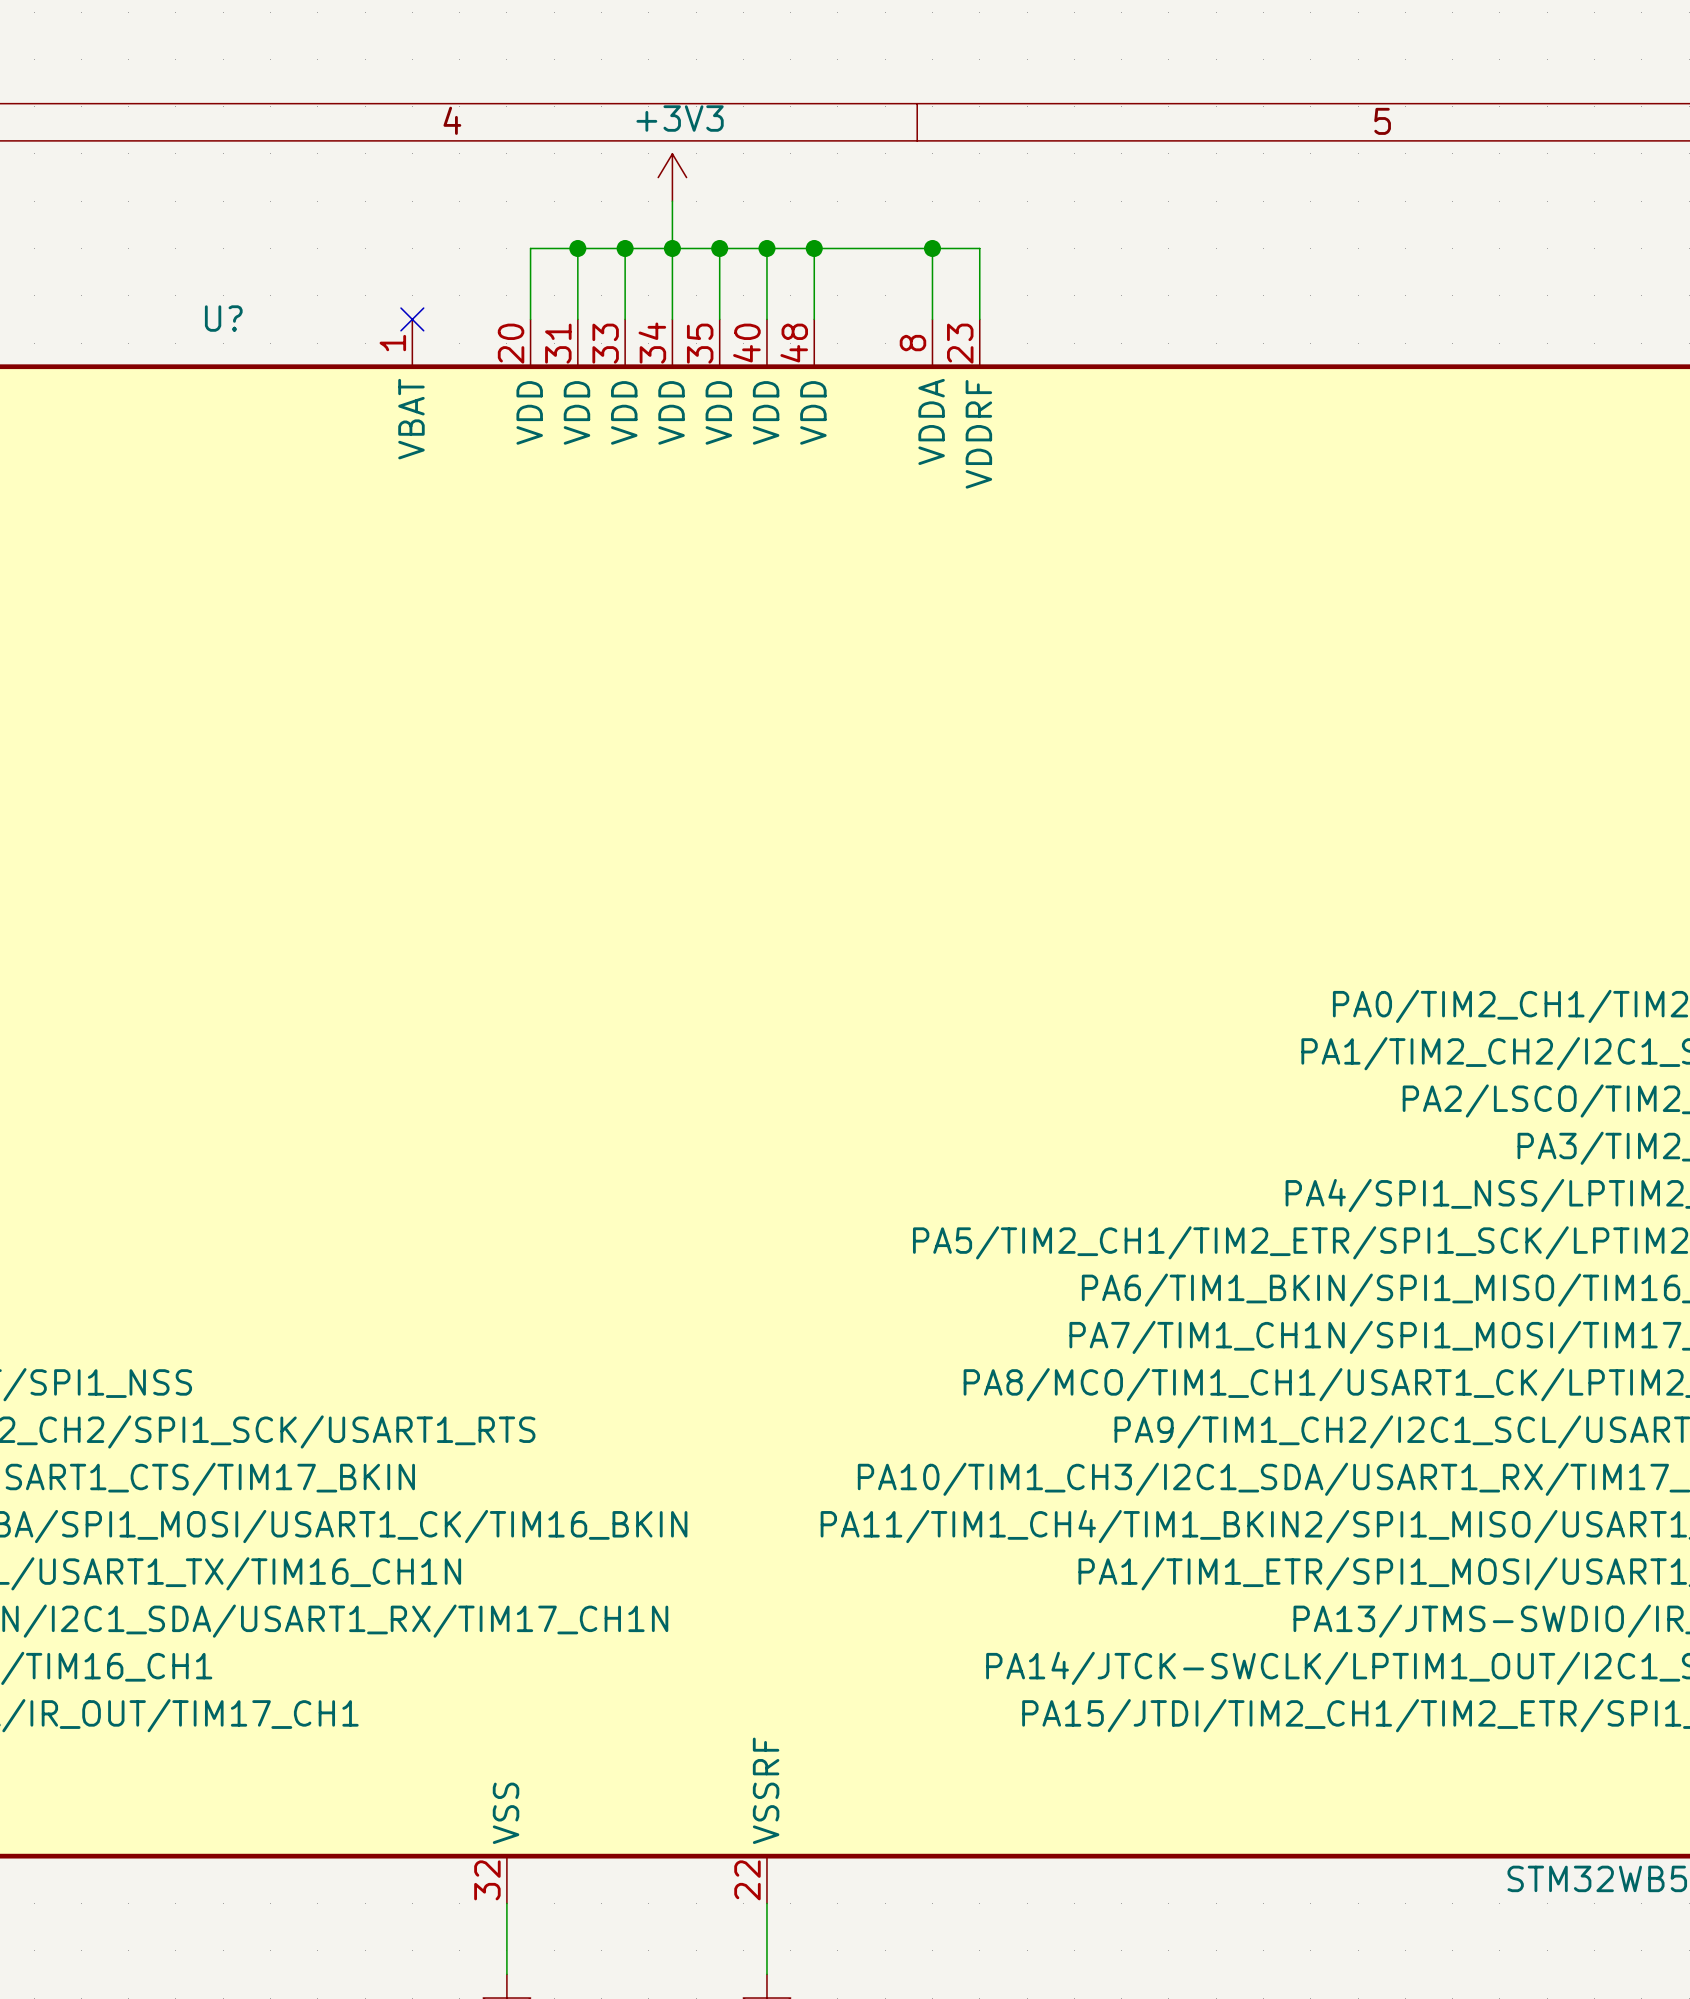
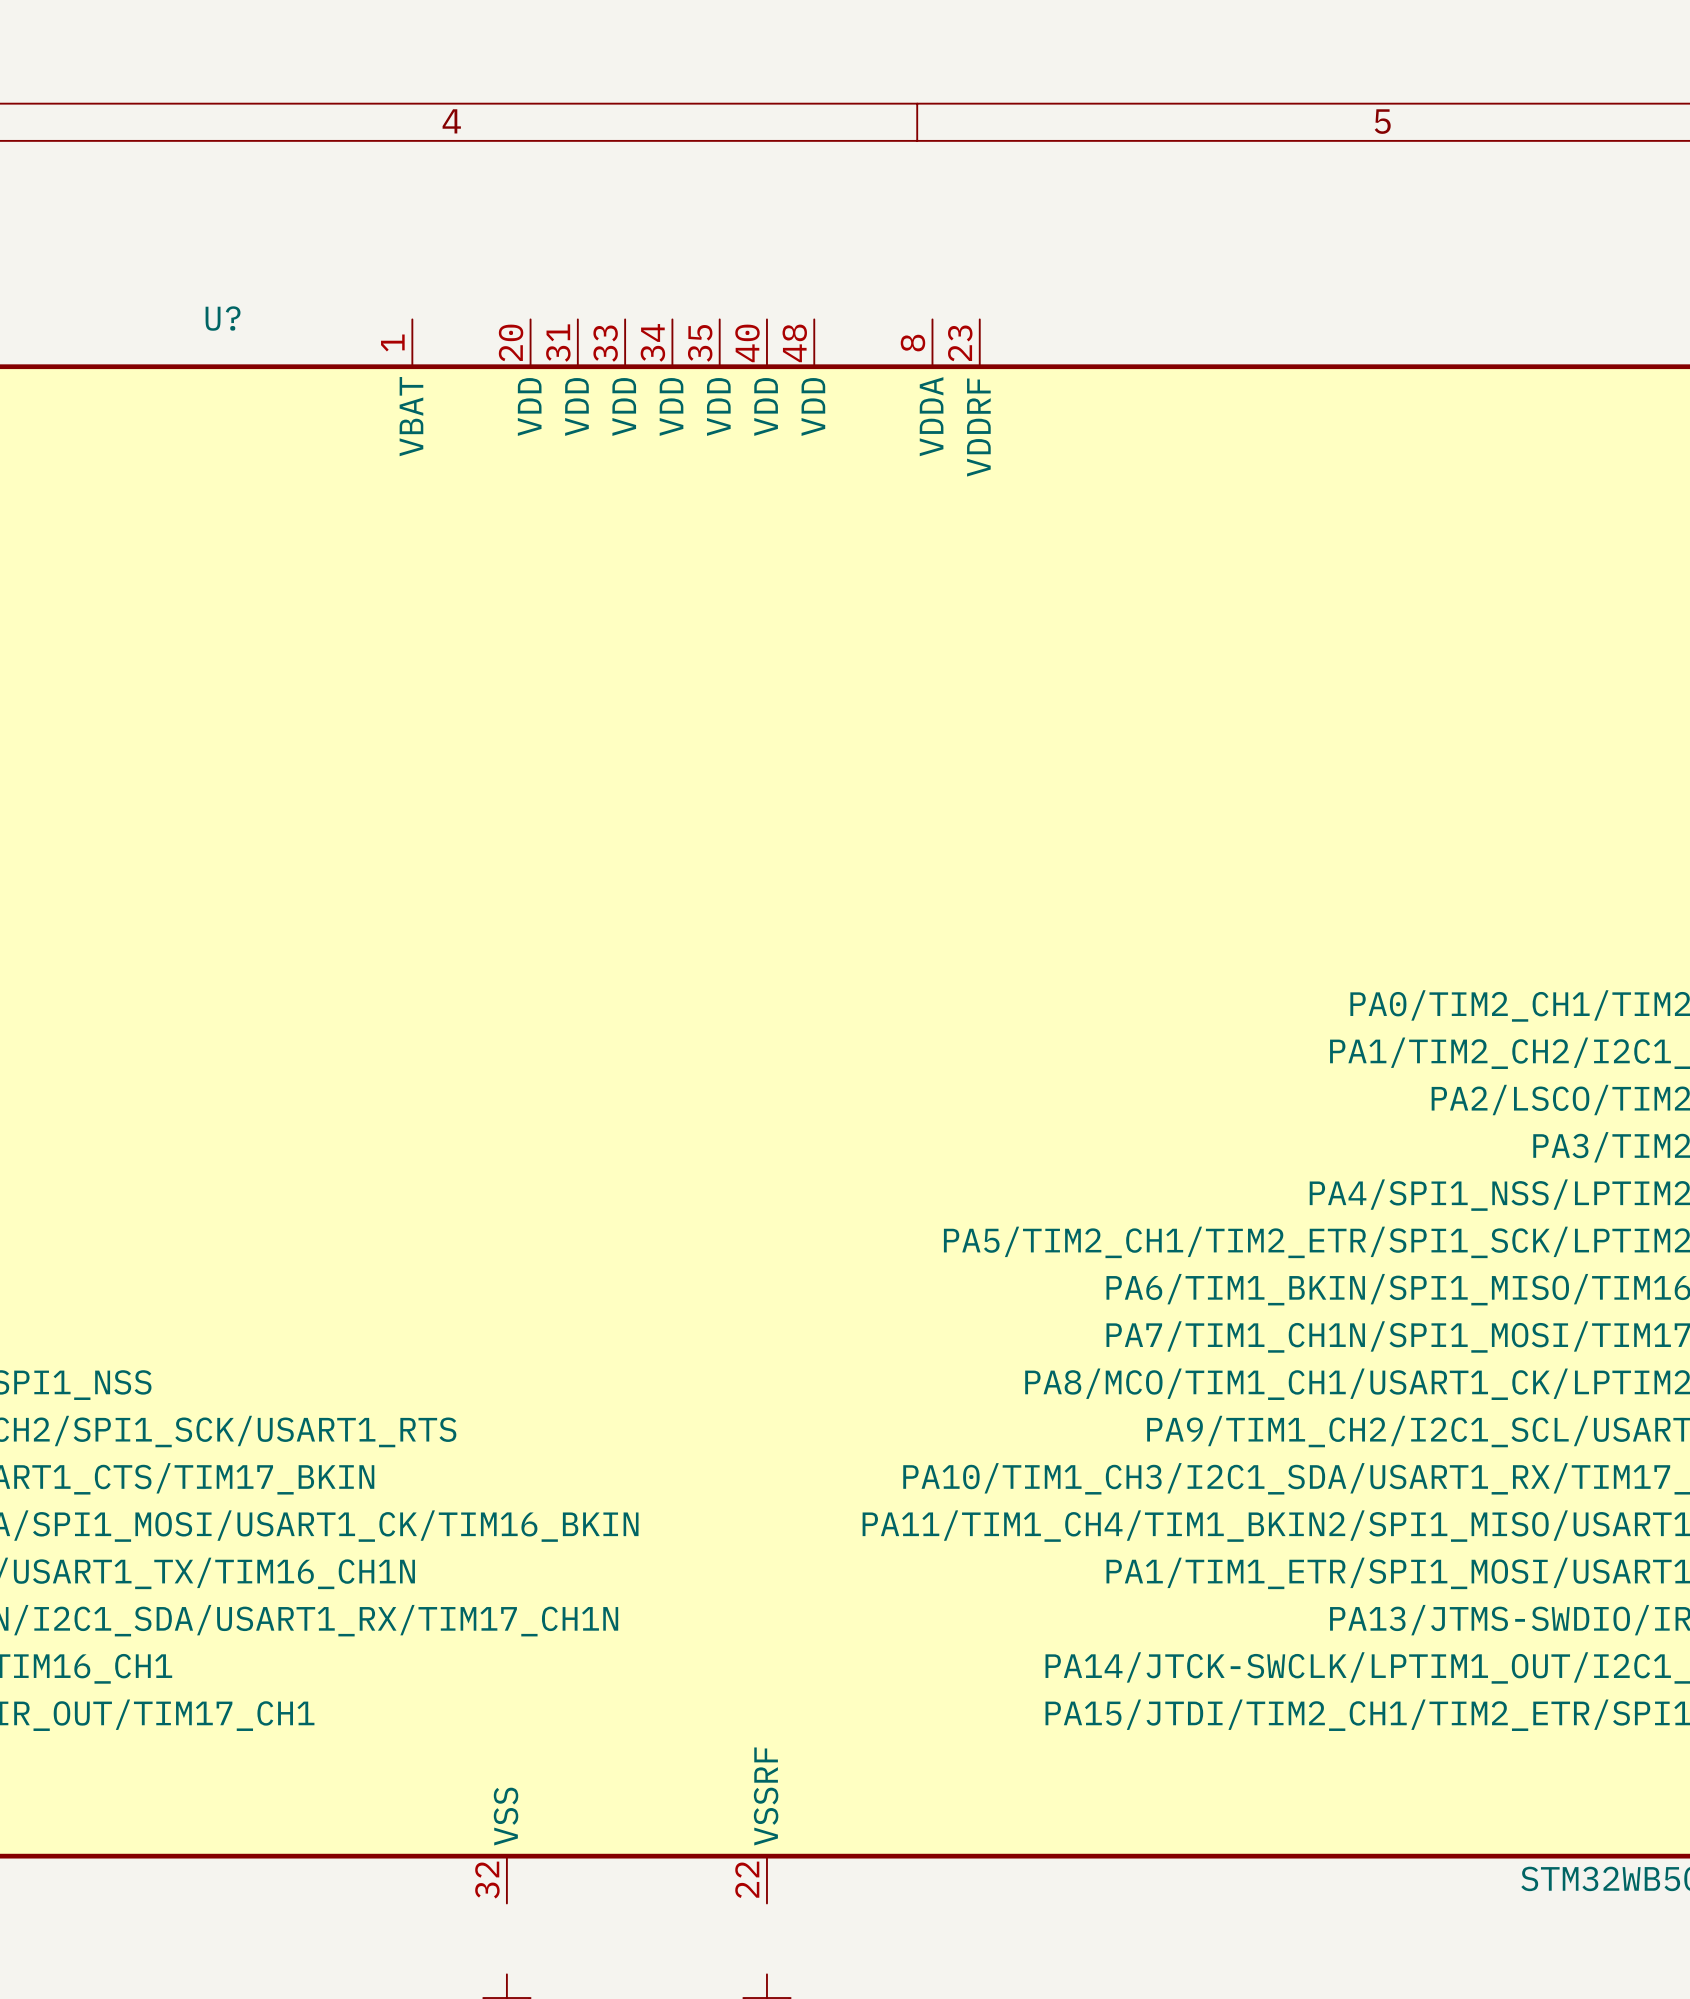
power symbol: +3V3 (672, 177) -> none
wire: (672, 201) (672, 319) -> none
wire: (577, 248) (577, 319) -> none
junction: (577, 248) -> none
wire: (625, 248) (625, 319) -> none
junction: (625, 248) -> none
junction: (672, 248) -> none
wire: (719, 248) (719, 319) -> none
junction: (719, 248) -> none
wire: (766, 248) (766, 319) -> none
junction: (766, 248) -> none
wire: (814, 248) (814, 319) -> none
junction: (814, 248) -> none
wire: (932, 248) (932, 319) -> none
junction: (932, 248) -> none
no-connect mark: (412, 319) -> none
wire: (530, 319) (530, 248) (979, 248) (979, 319) -> none
wire: (506, 1903) (506, 1974) -> none
wire: (766, 1903) (766, 1974) -> none

